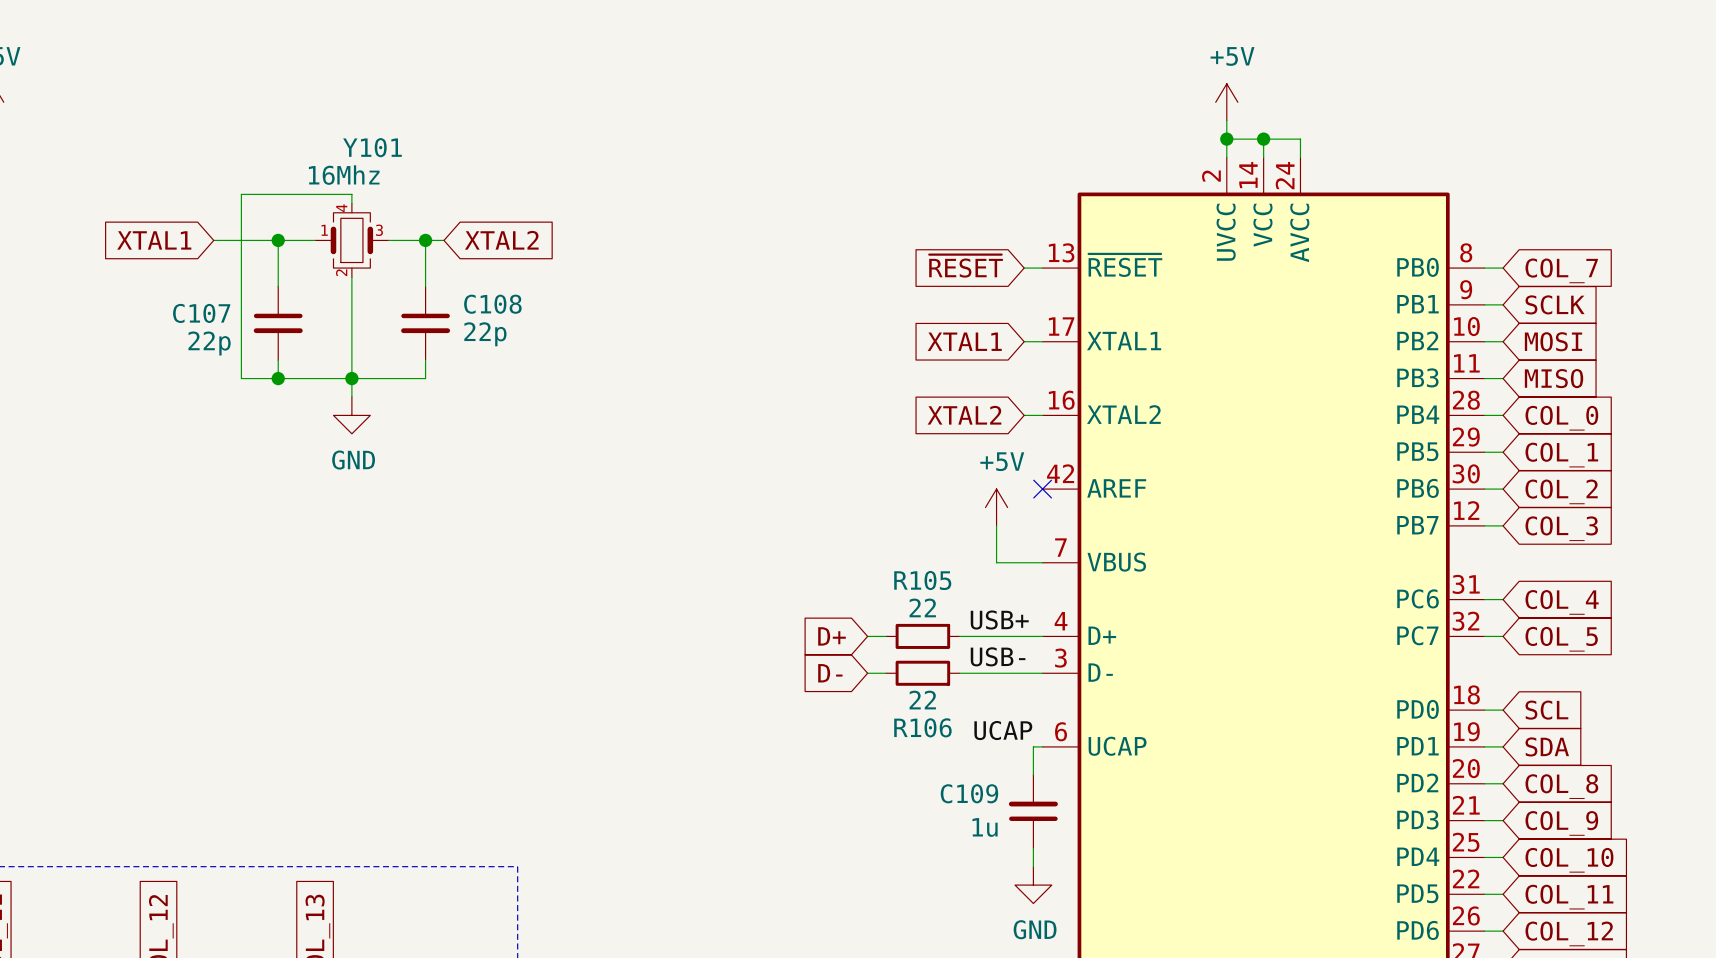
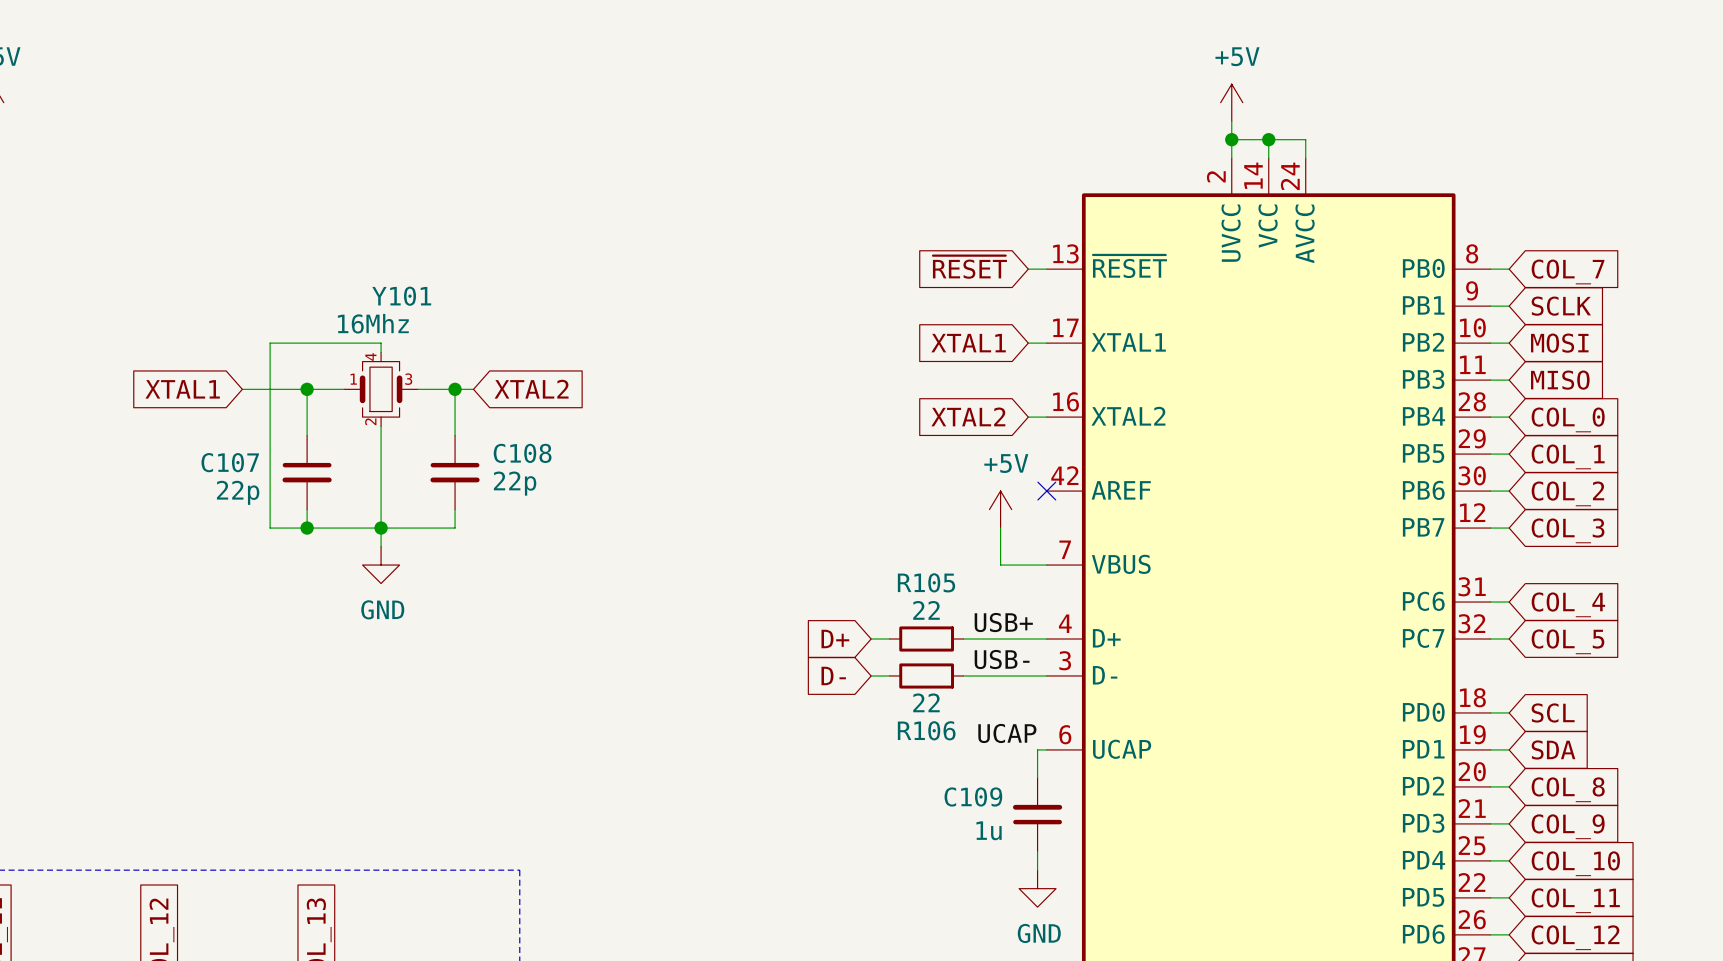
wire: (351, 203) (351, 194) (241, 194) (241, 378) (425, 378) (425, 360) -> (381, 352) (381, 343) (270, 343) (270, 528) (455, 528) (455, 509)
global label position: XTAL1 (154, 240) -> XTAL1 (182, 389)
wire: (213, 240) (315, 240) -> (242, 389) (344, 389)
wire: (278, 240) (278, 286) -> (307, 389) (307, 435)
junction: (278, 240) -> none
Y101 position: (351, 240) -> (381, 389)
wire: (388, 240) (444, 240) -> (418, 389) (473, 389)
wire: (425, 240) (425, 286) -> (455, 389) (455, 435)
junction: (425, 240) -> none
global label position: XTAL2 (501, 240) -> XTAL2 (531, 389)
wire: (351, 277) (351, 396) -> (381, 426) (381, 546)
C107 position: (278, 323) -> (307, 472)
C108 position: (425, 323) -> (455, 472)
wire: (278, 360) (278, 378) -> (307, 509) (307, 528)
junction: (278, 378) -> none
junction: (351, 378) -> none
junction: none -> (307, 389)
junction: none -> (455, 389)
power symbol position: GND (351, 415) -> GND (381, 565)
junction: none -> (307, 528)
junction: none -> (381, 528)

